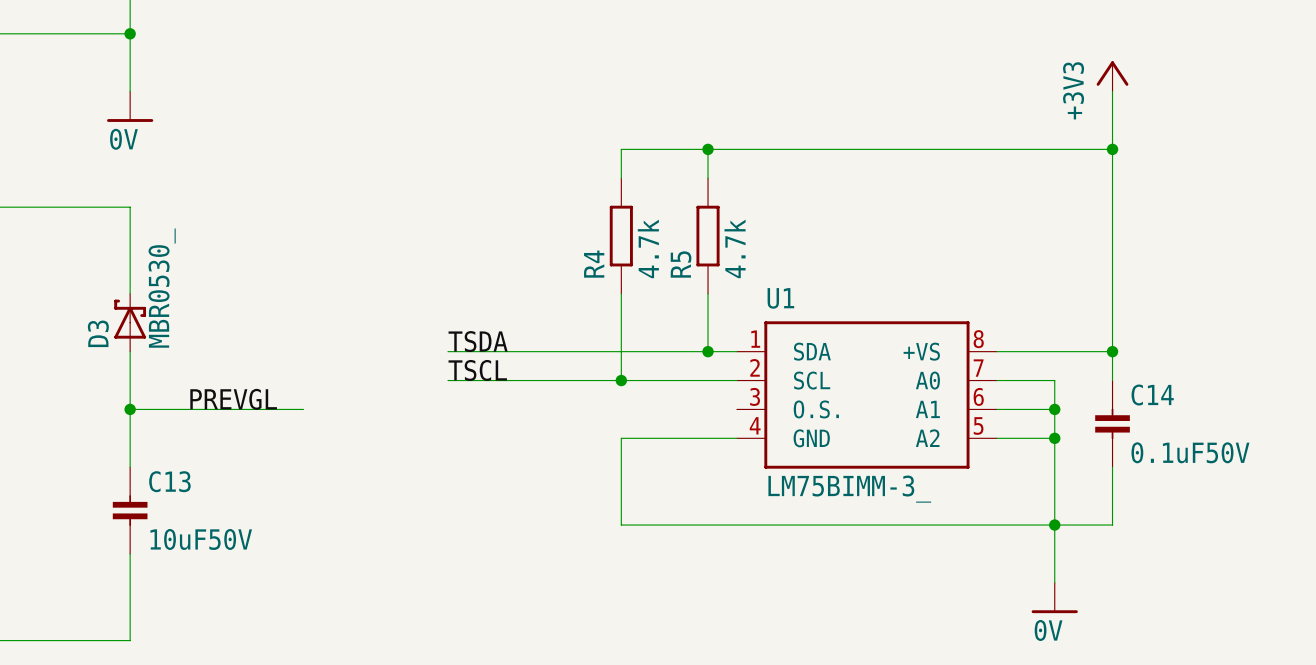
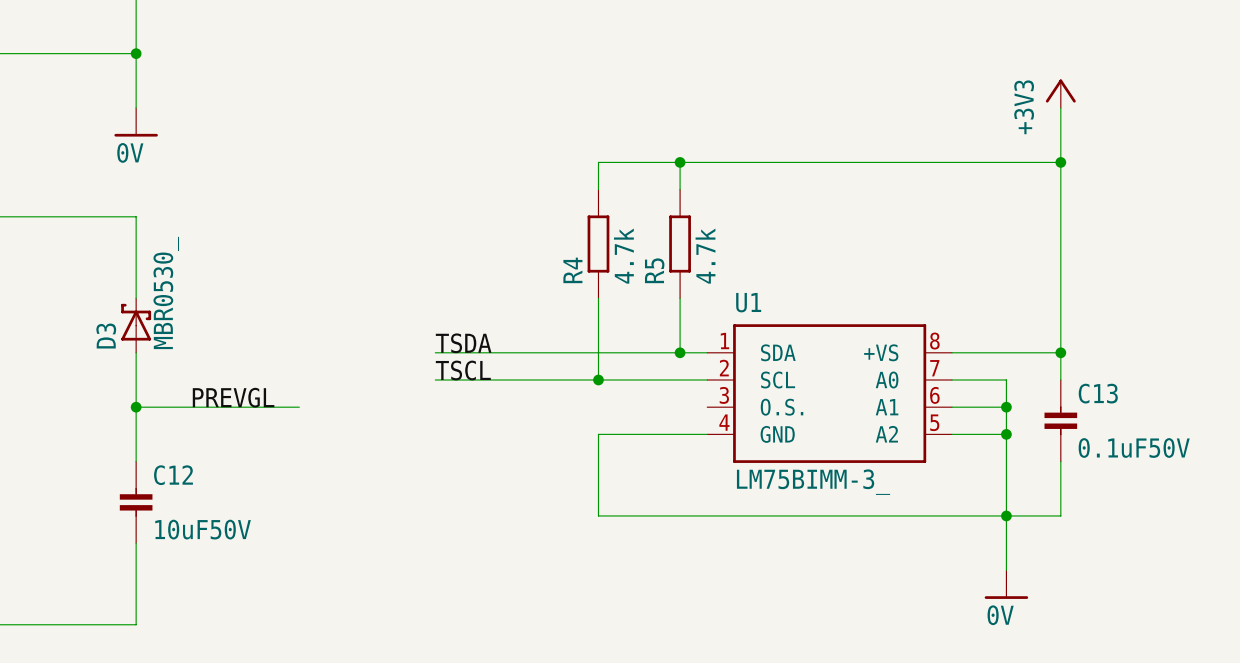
C14 name: C14 (1152, 395) -> C13 (1098, 393)
C13 name: C13 (169, 481) -> C12 (173, 475)

